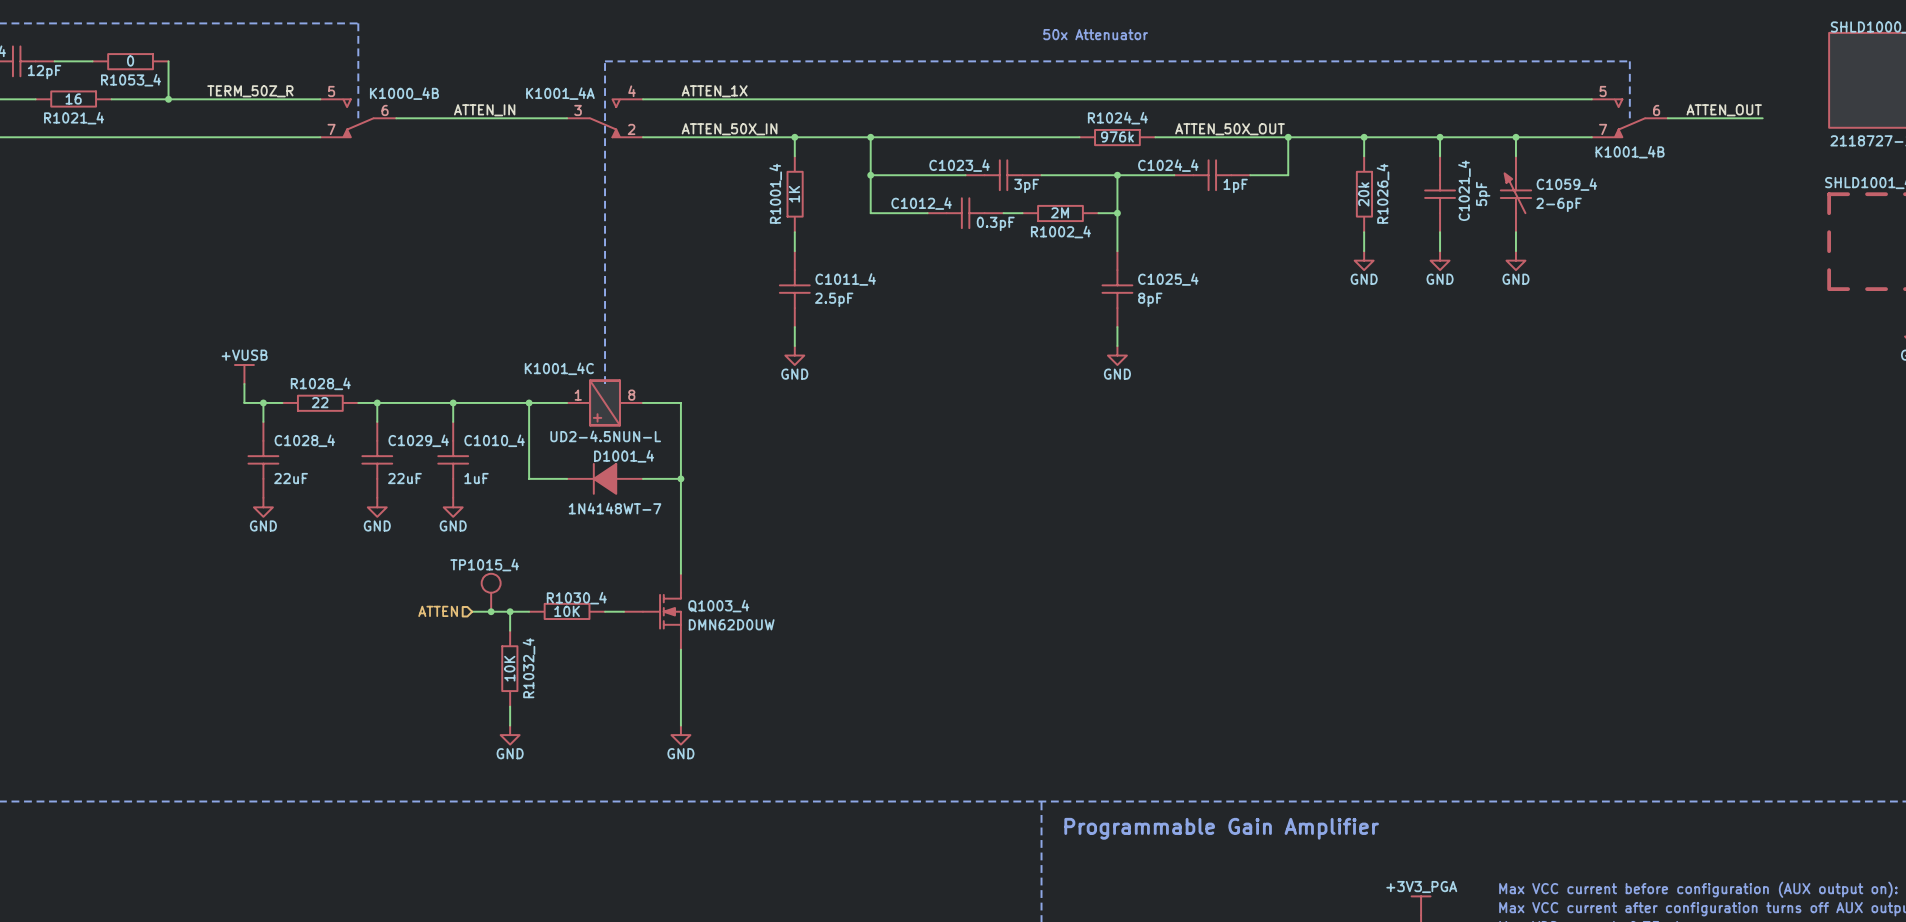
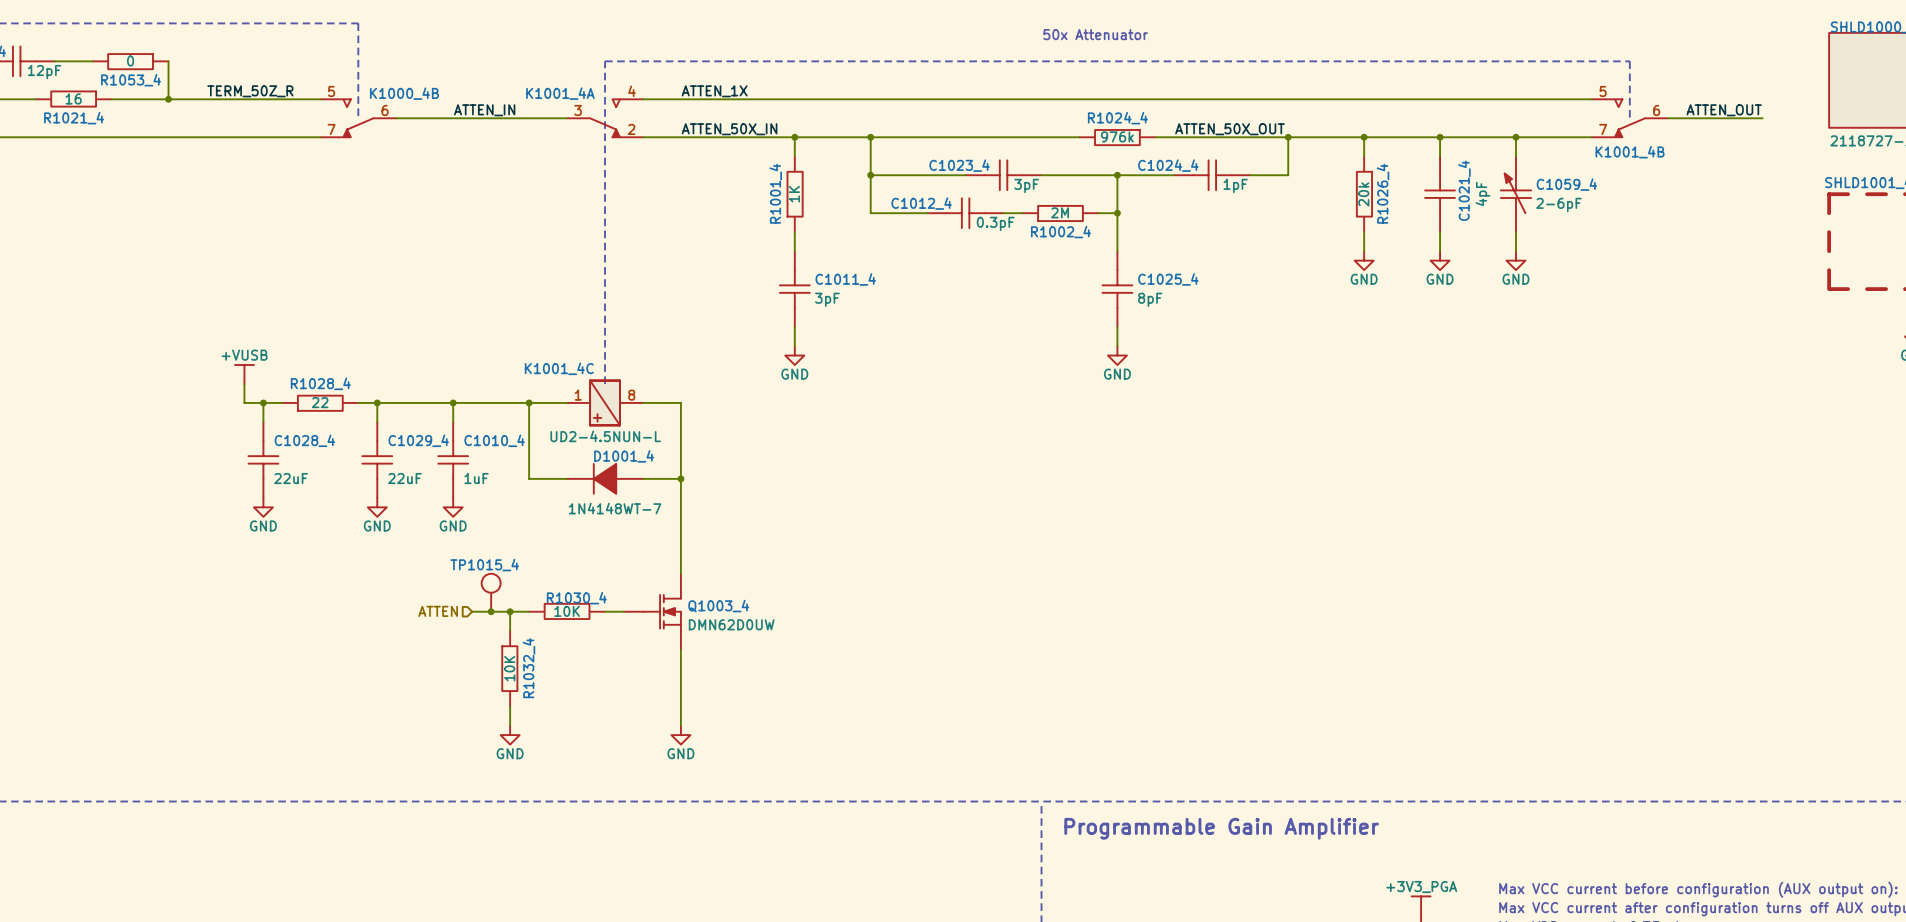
C1021_4 value: 5pF (1483, 193) -> 4pF (1482, 193)
C1011_4 value: 2.5pF (834, 299) -> 3pF (827, 299)

